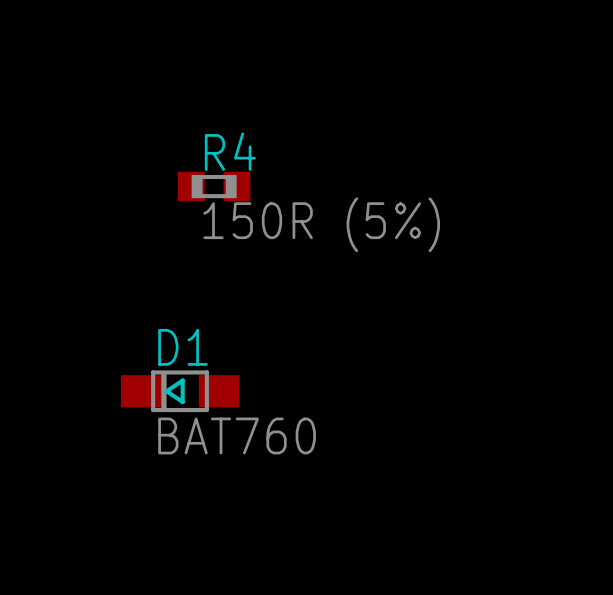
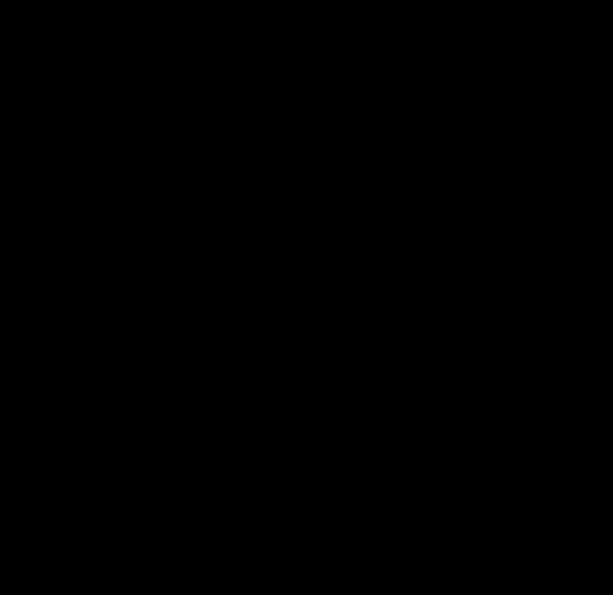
R4: 150R (5%) (214, 186) -> none
D1: BAT760 (180, 391) -> none

